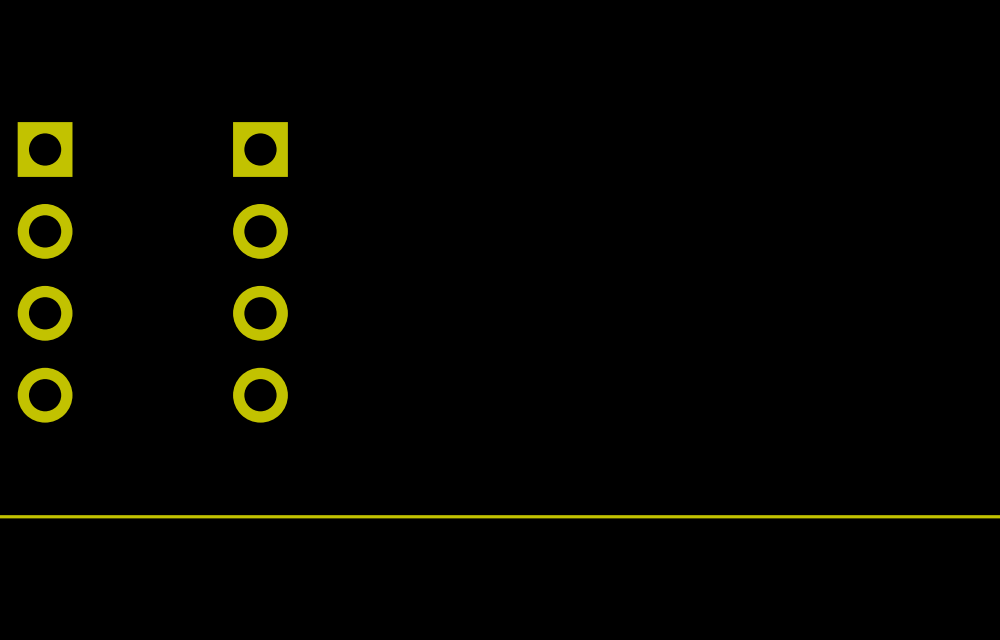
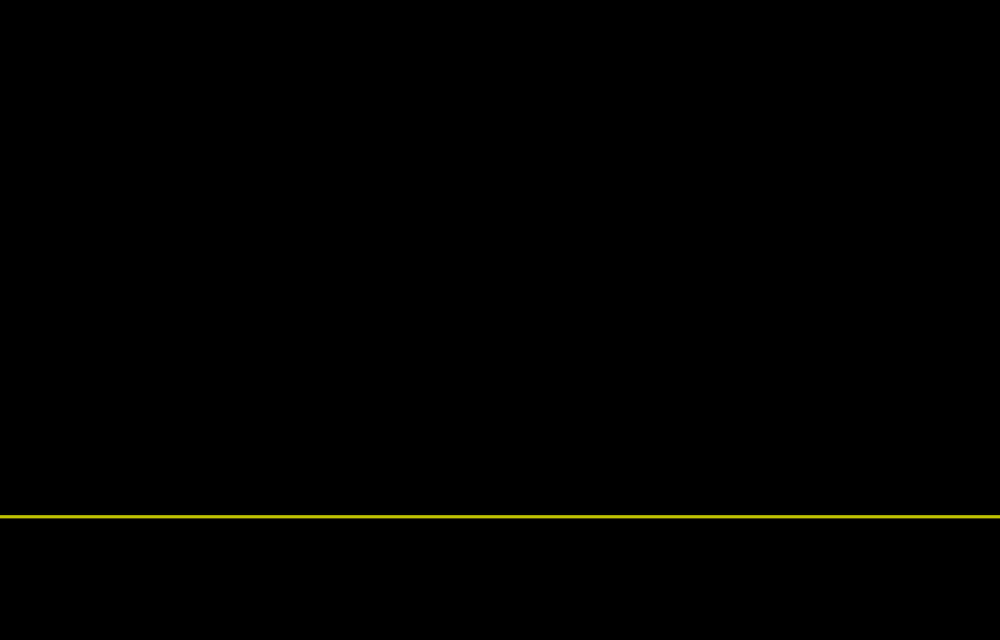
part: (45, 272) -> none
part: (260, 272) -> none

